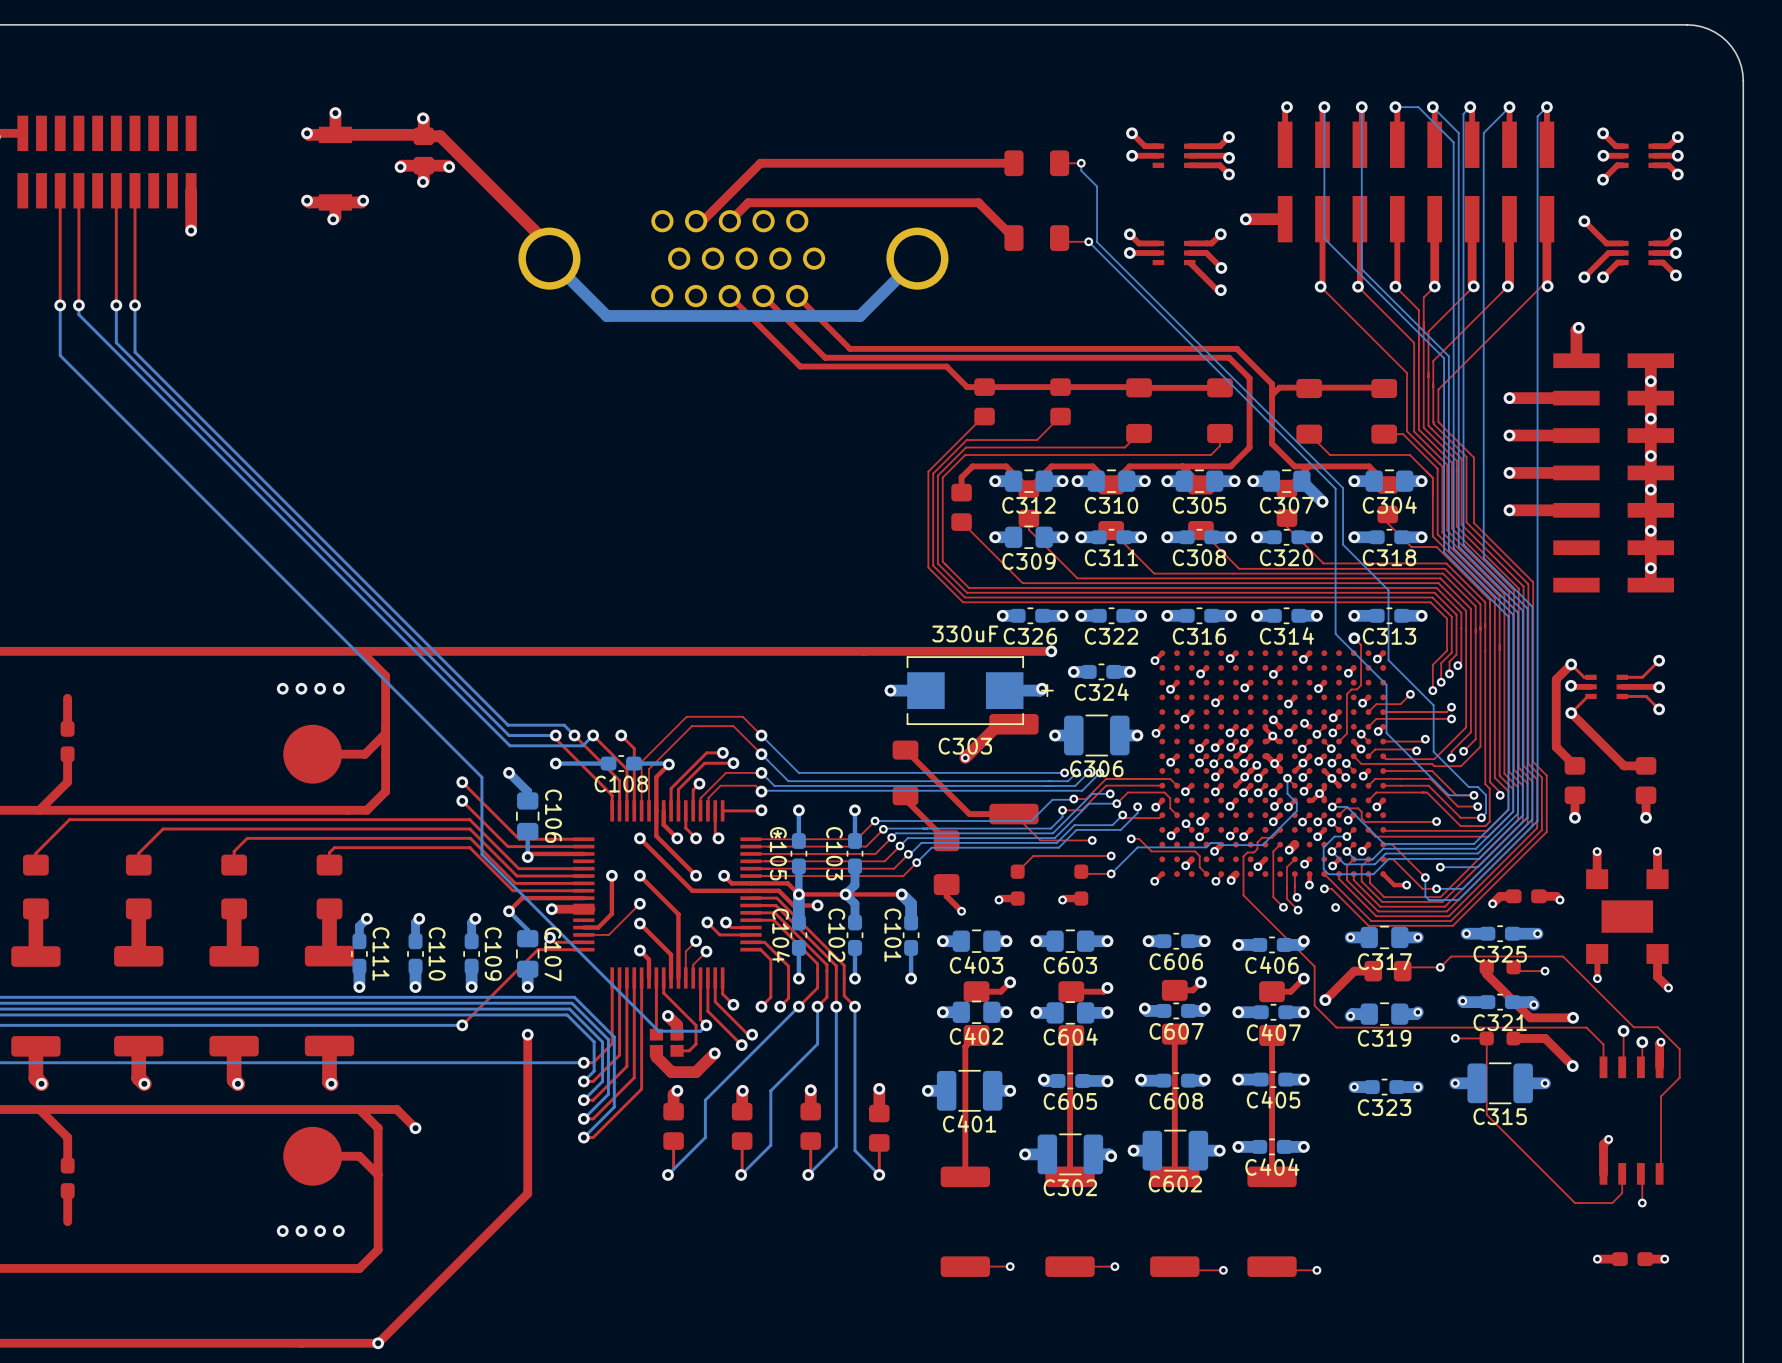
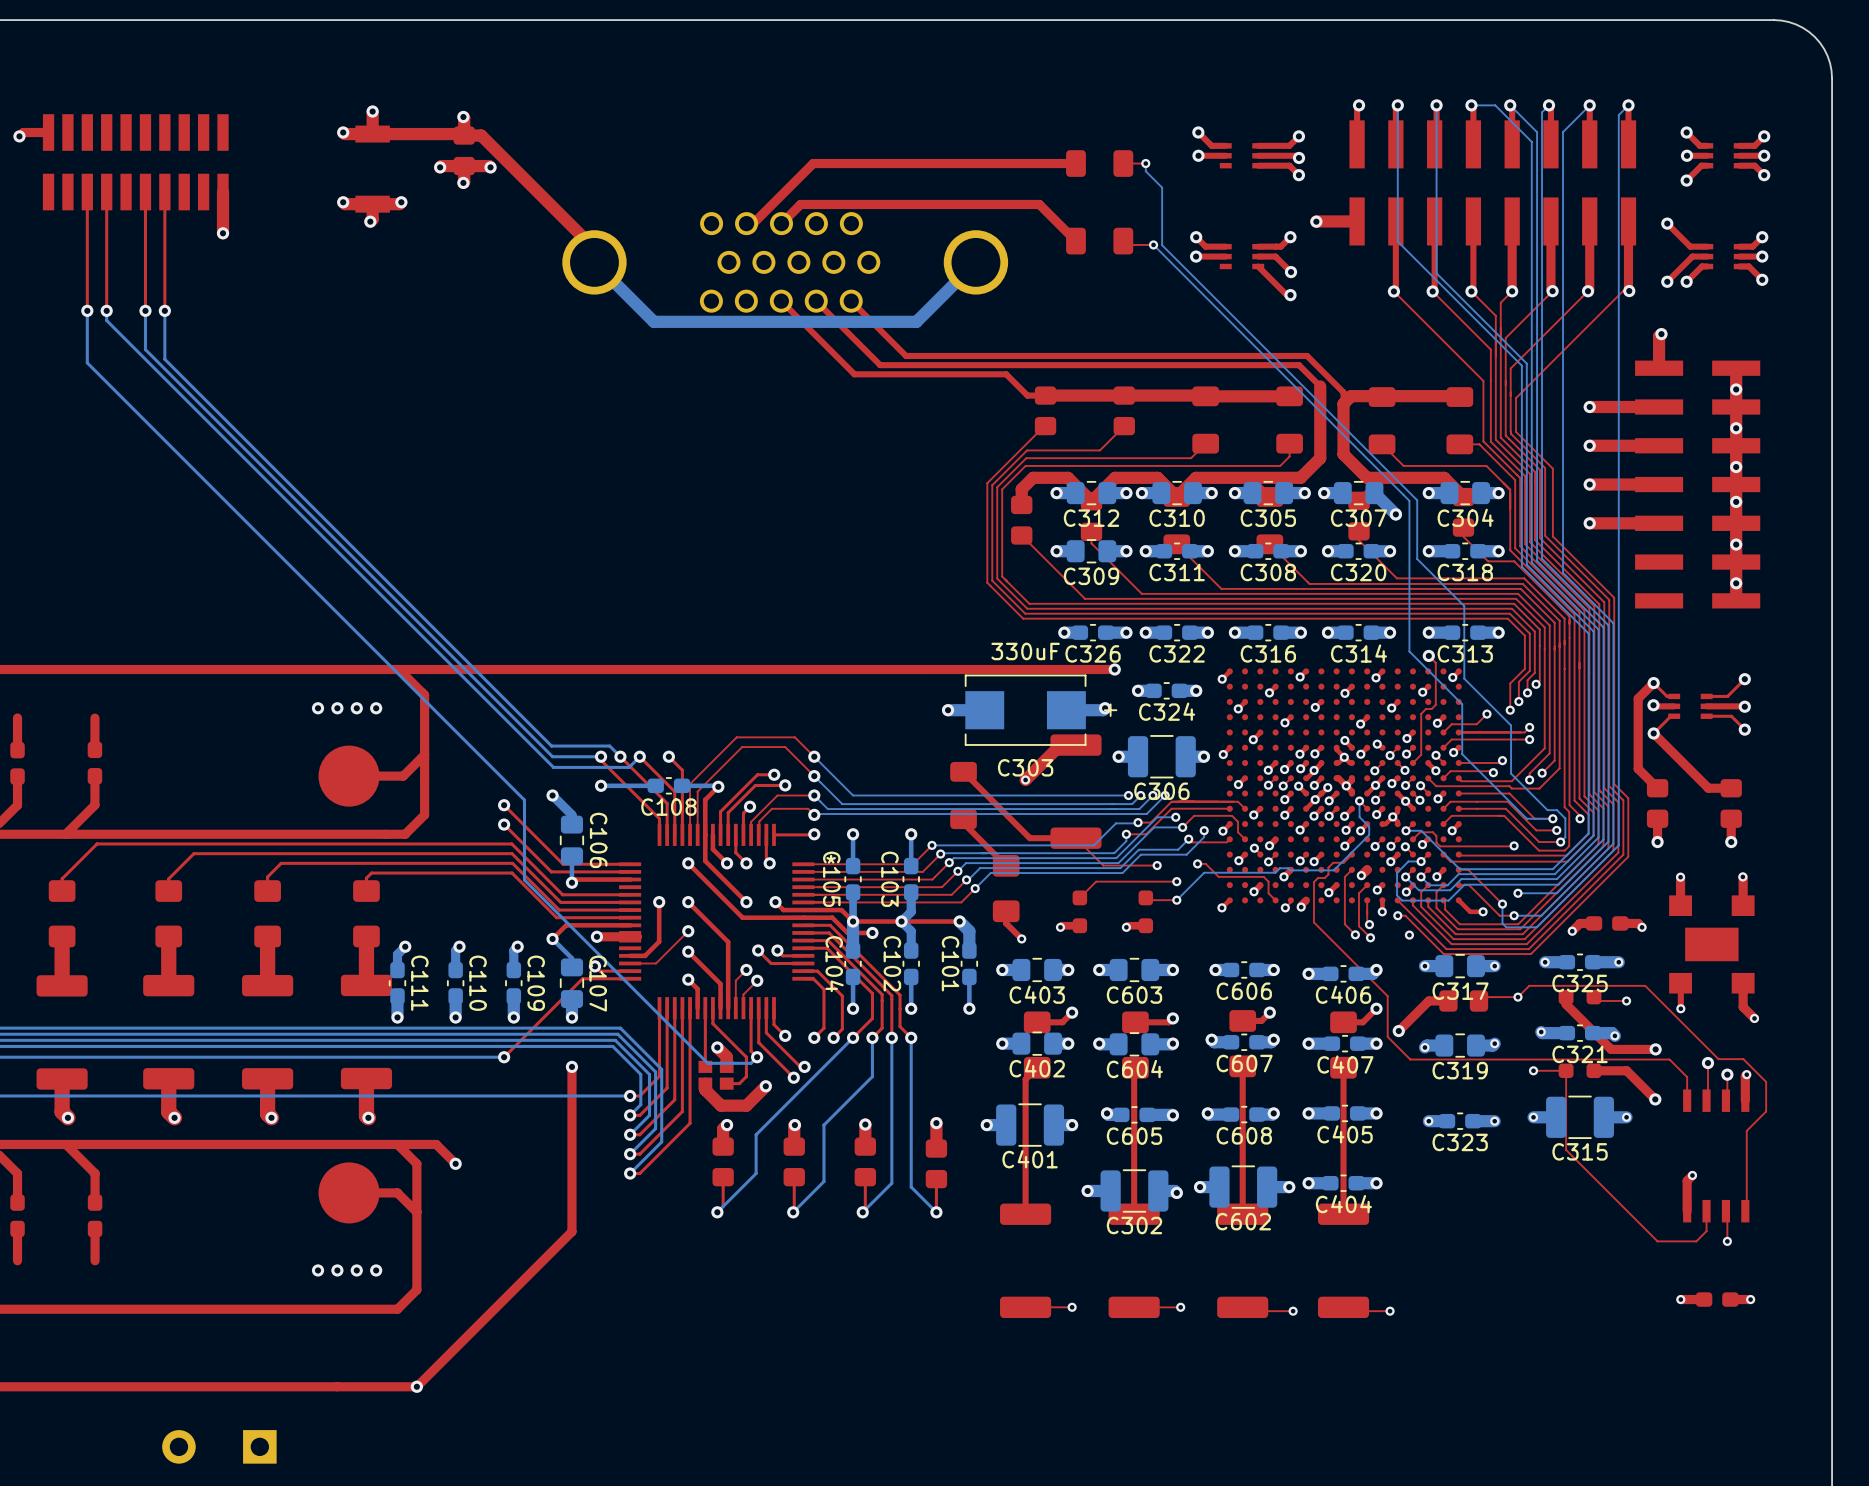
top track width: thin (1249, 378) (1249, 447) (1230, 466) (1129, 466) (1111, 484) (1092, 466) (1051, 466) (1028, 489) (1006, 466) (972, 466) (961, 477) (961, 492) -> thick (1320, 386) (1320, 458) (1300, 477) (1195, 477) (1176, 496) (1157, 477) (1115, 477) (1091, 501) (1068, 477) (1033, 477) (1021, 489) (1021, 504)
top track width: thin (1138, 387) (984, 387) -> thick (1204, 395) (1045, 395)
top track width: thin (1220, 387) (1139, 387) -> thick (1289, 396) (1205, 396)
top track width: thin (1389, 387) (1279, 387) (1272, 395) (1272, 443) (1294, 466) (1369, 466) (1387, 485) -> thick (1465, 396) (1351, 396) (1343, 403) (1343, 454) (1367, 477) (1444, 477) (1463, 497)

